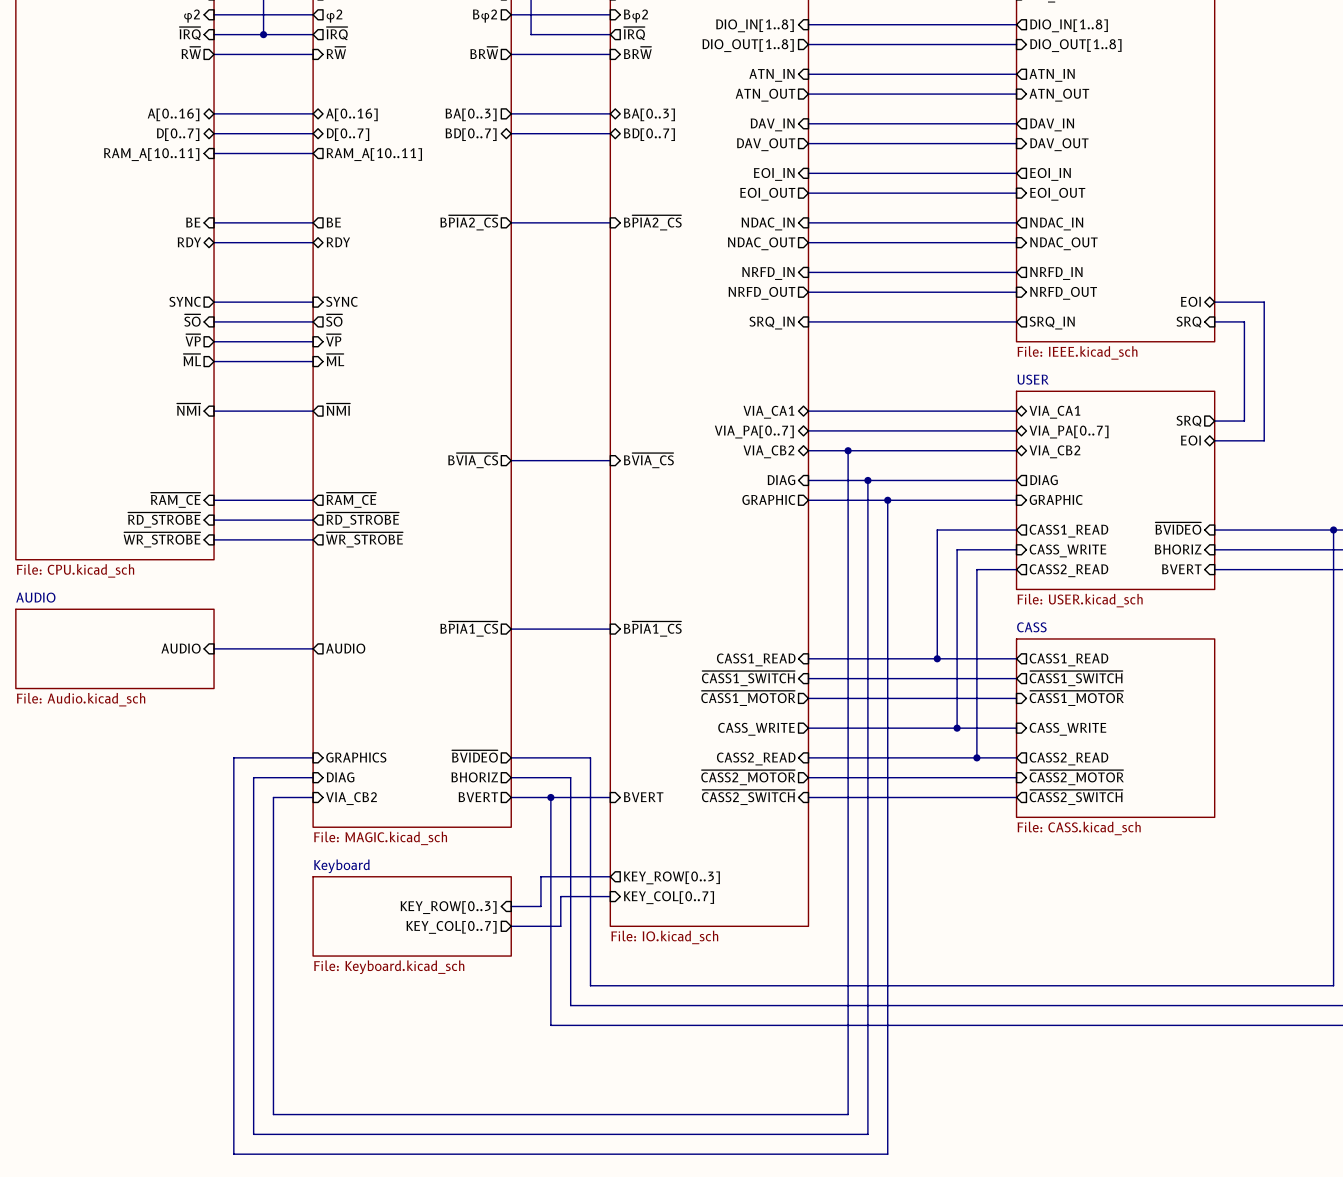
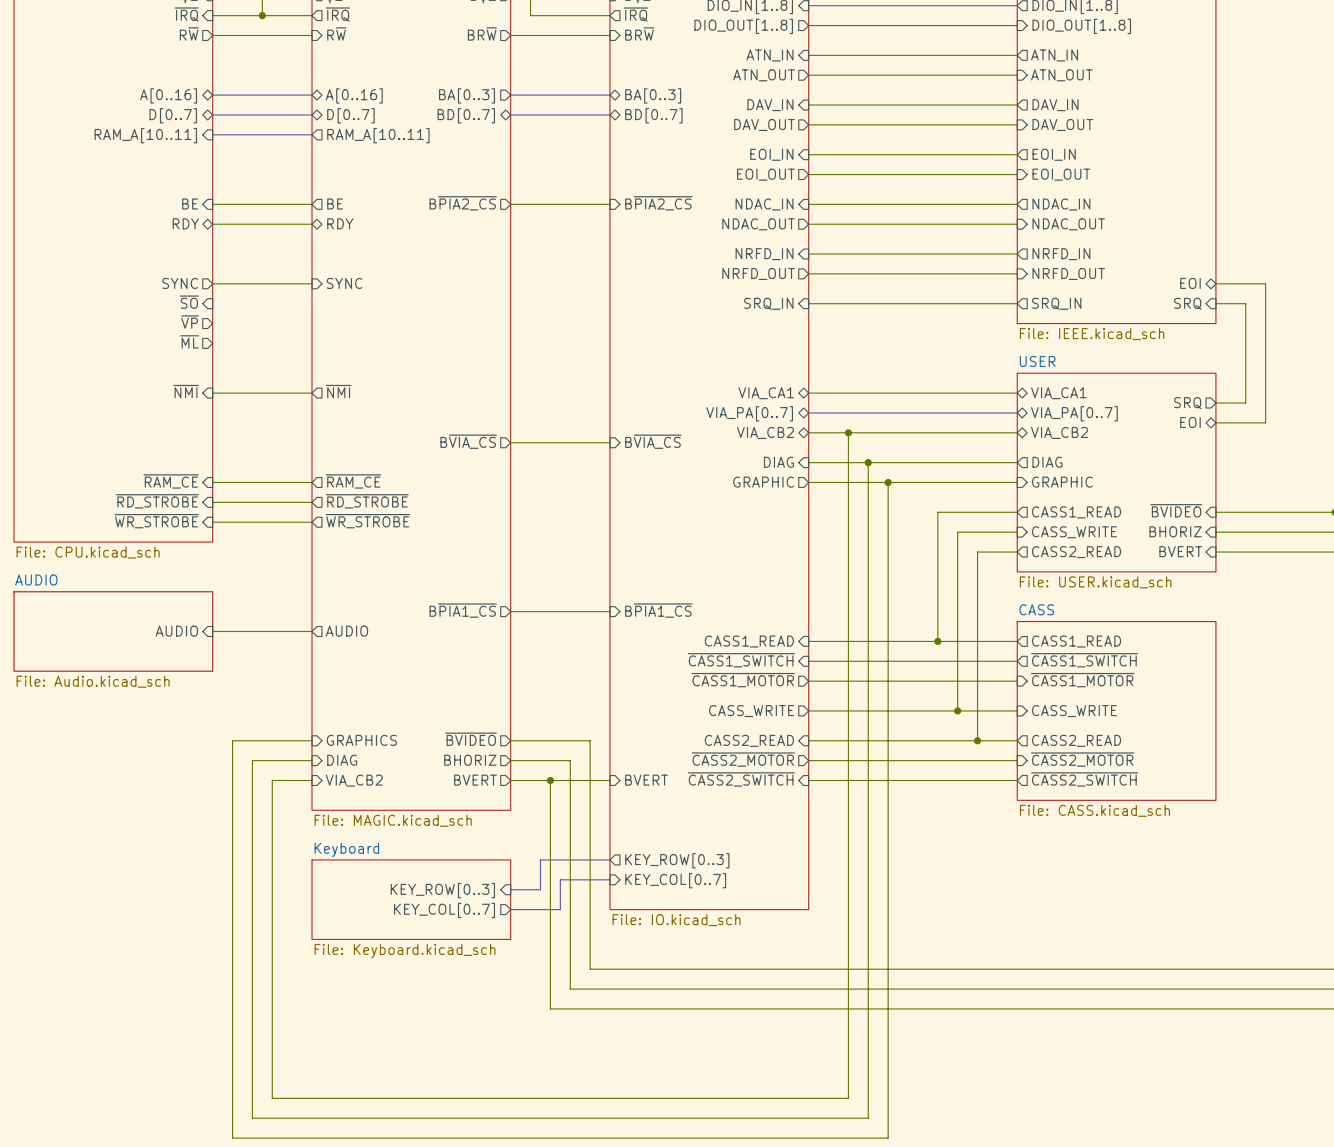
sheet pin: ~{SO} (334, 320) -> none
wire: (214, 321) (313, 321) -> none
sheet pin: ~{VP} (333, 340) -> none
wire: (214, 341) (313, 341) -> none
sheet pin: ~{ML} (335, 360) -> none
wire: (214, 361) (313, 361) -> none

